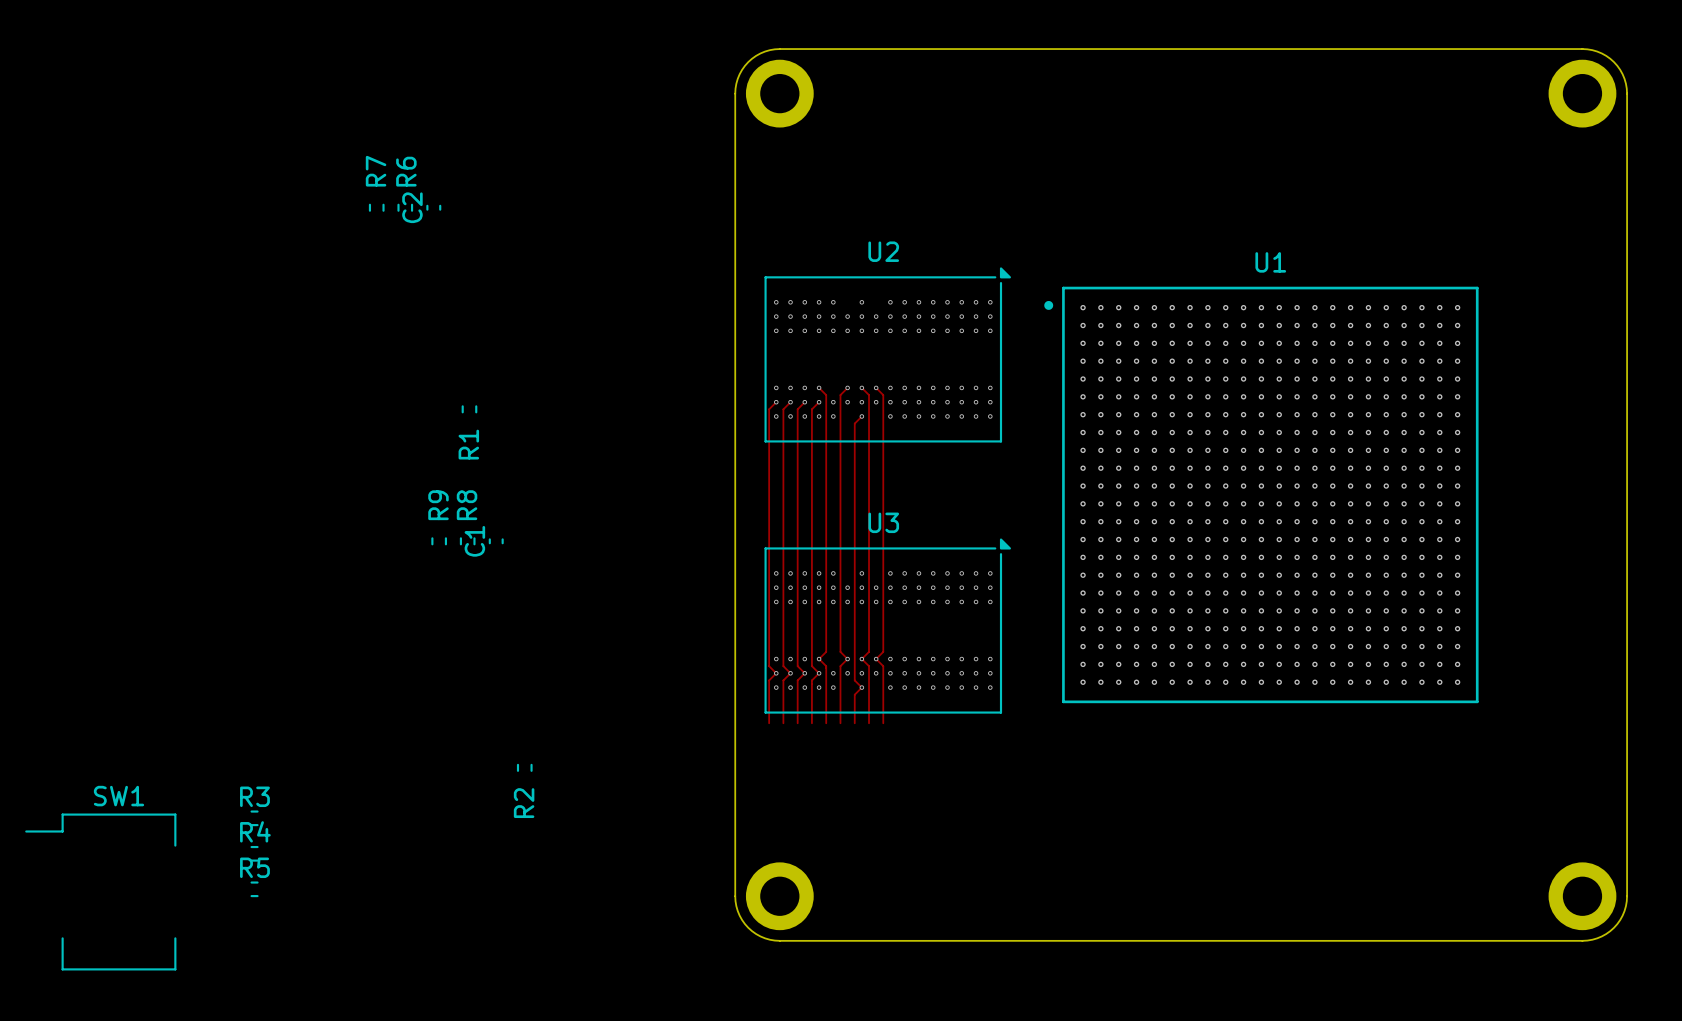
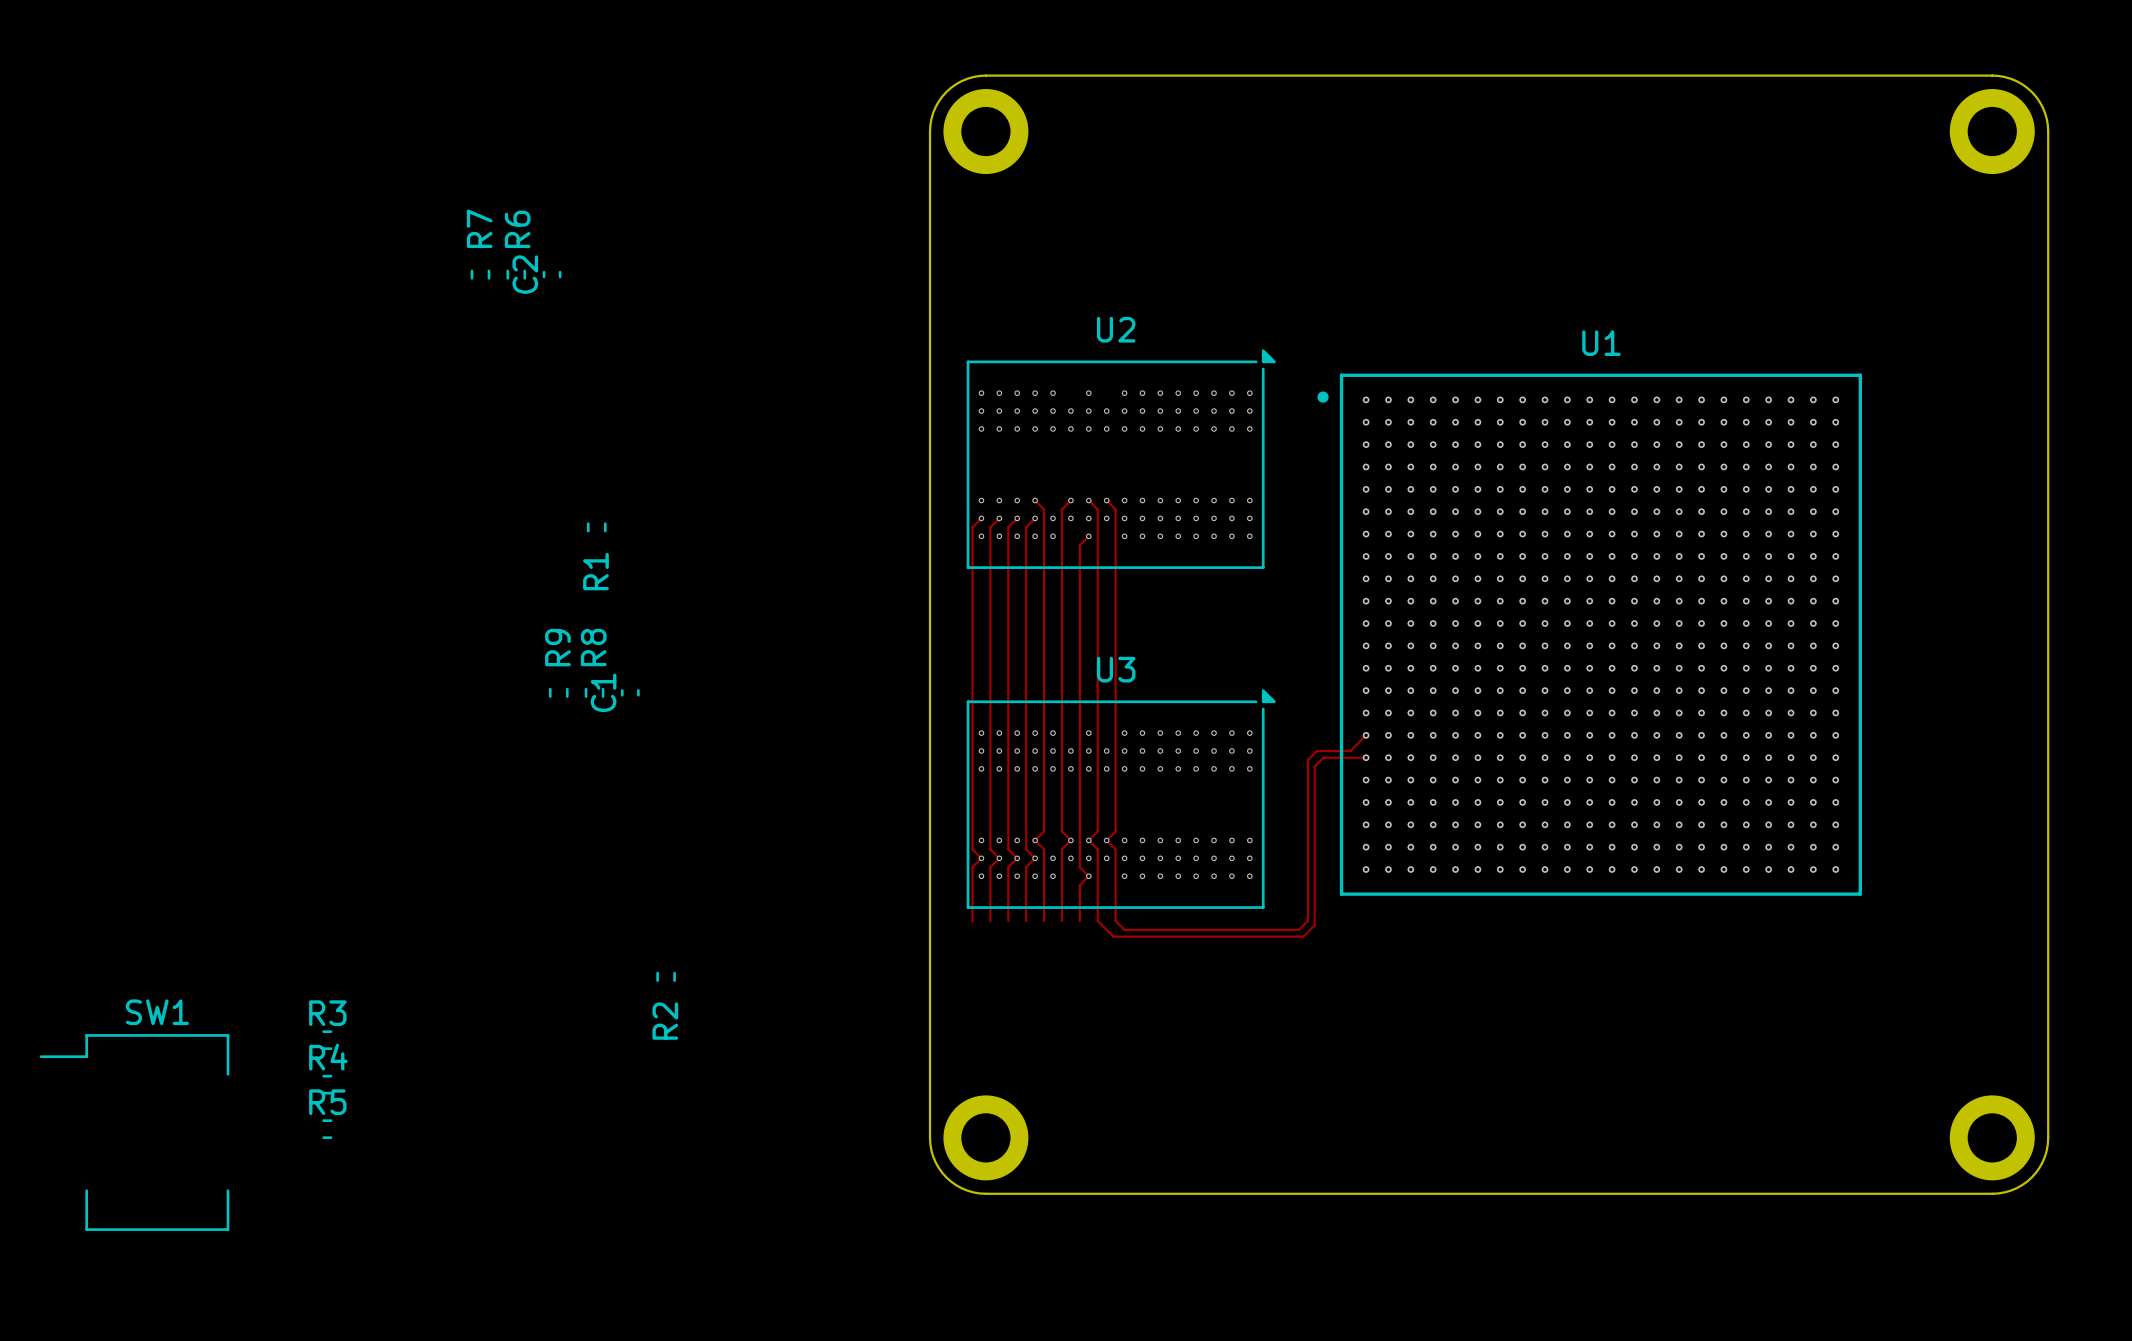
track: none -> (1366, 735) (1350, 750) (1316, 750) (1307, 759) (1307, 920) (1299, 929) (1124, 929) (1115, 920)
track: none -> (1366, 757) (1323, 757) (1314, 766) (1314, 925) (1303, 936) (1113, 936) (1097, 920)

